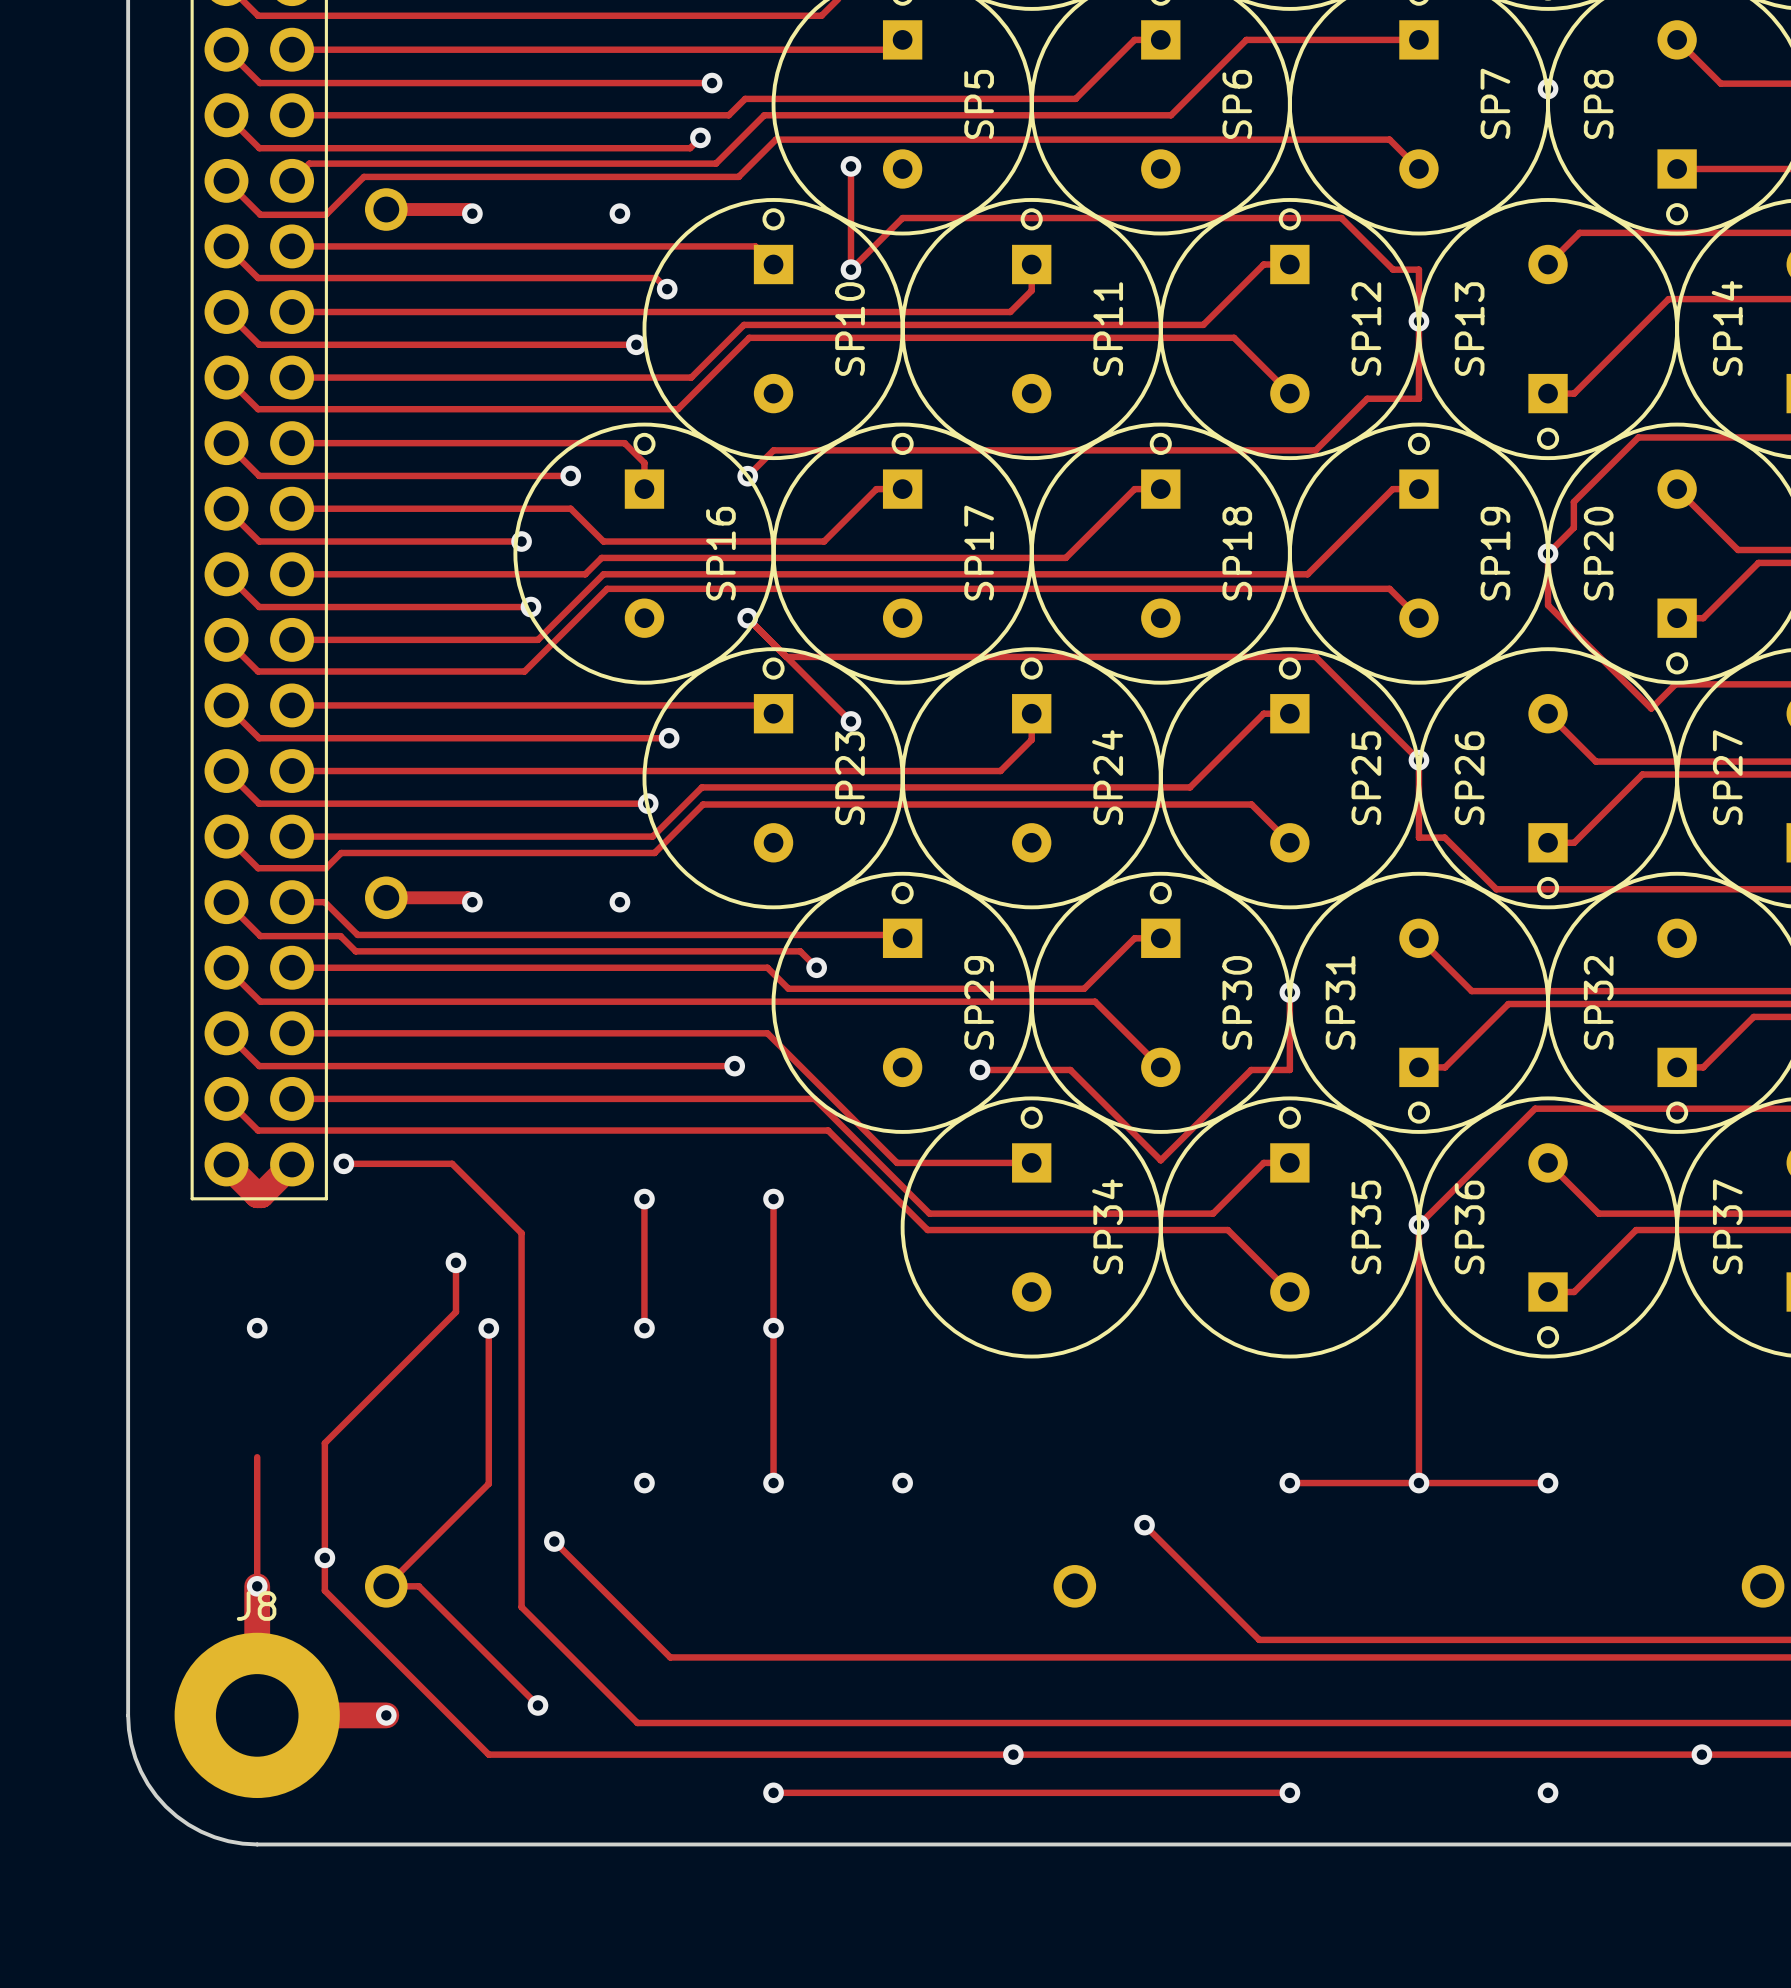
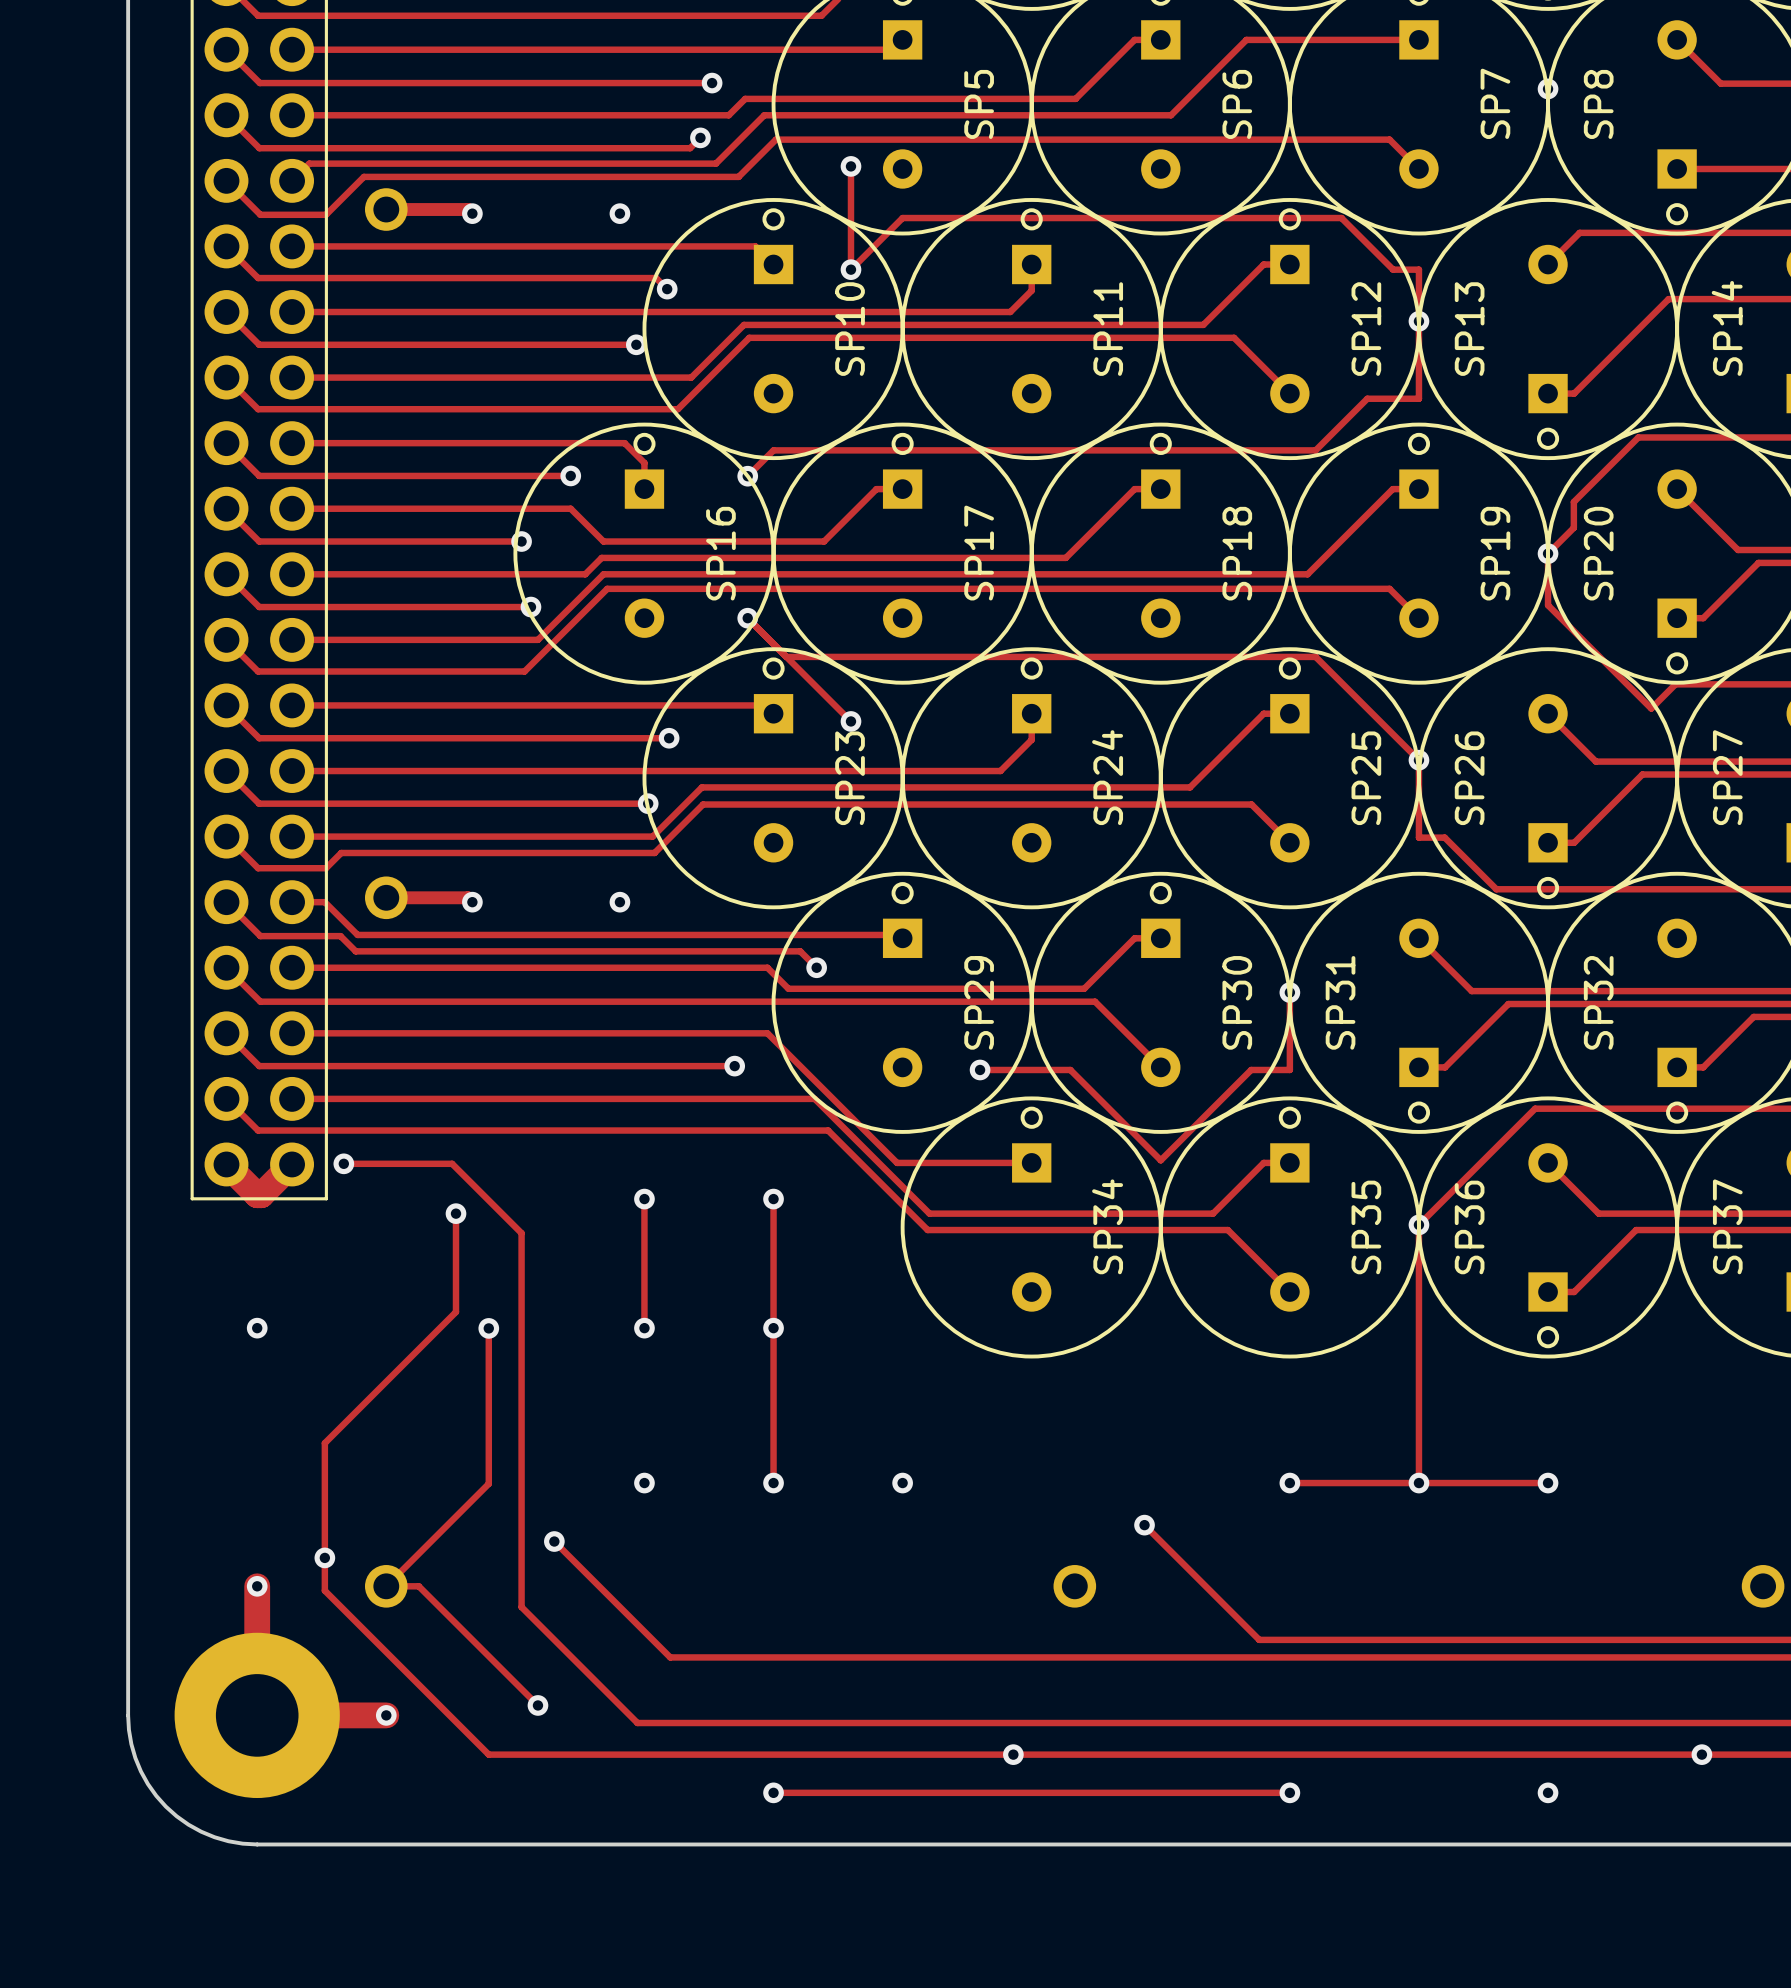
track: none -> (456, 1213) (456, 1262)
via position: (456, 1262) -> (456, 1213)
track: (257, 1457) (257, 1586) -> none
J8 name: J8 (256, 1606) -> none

